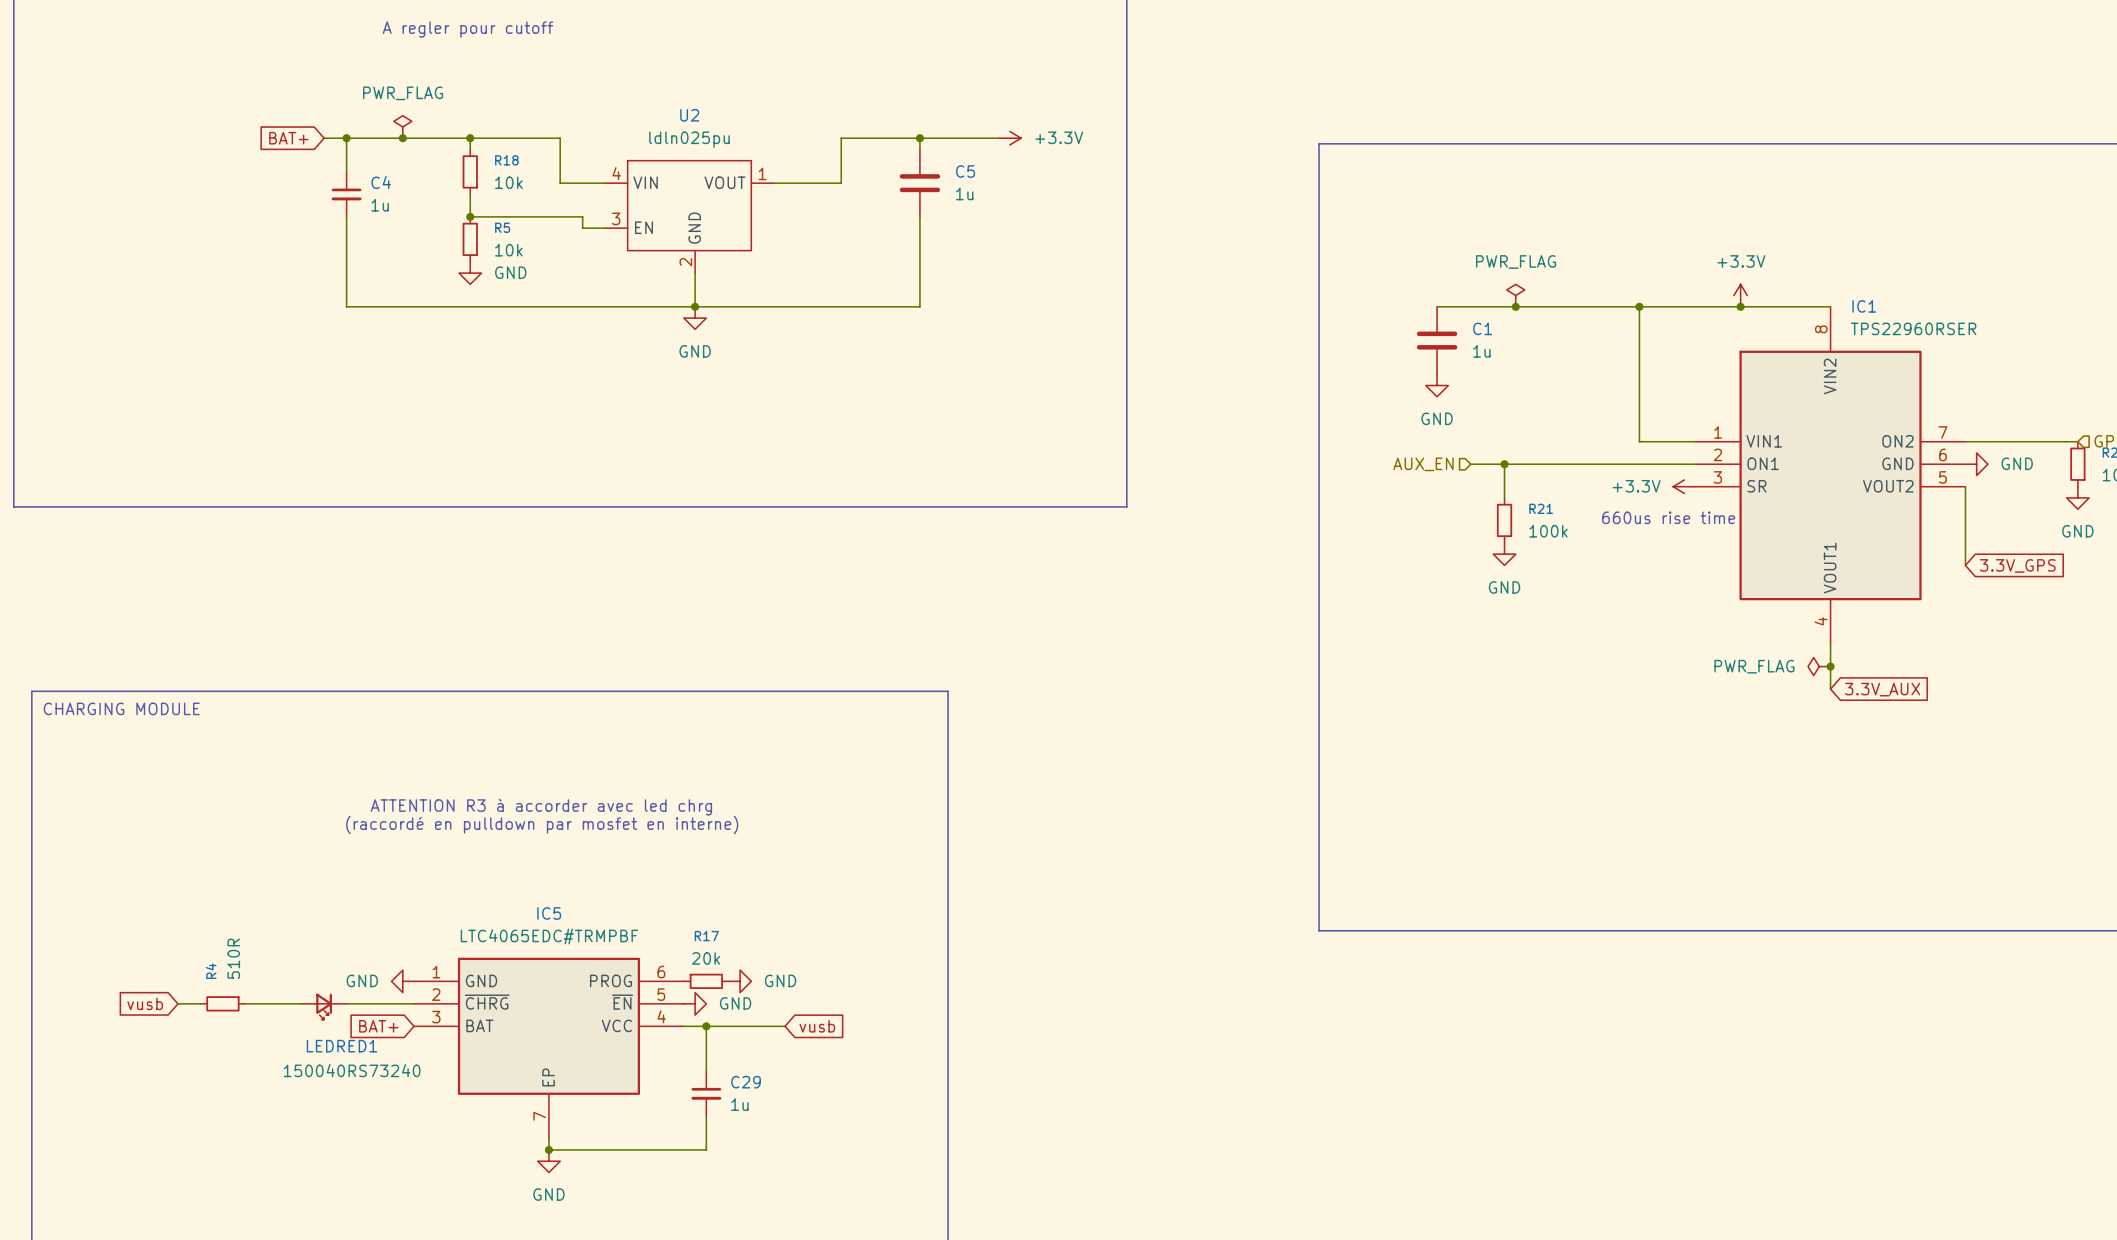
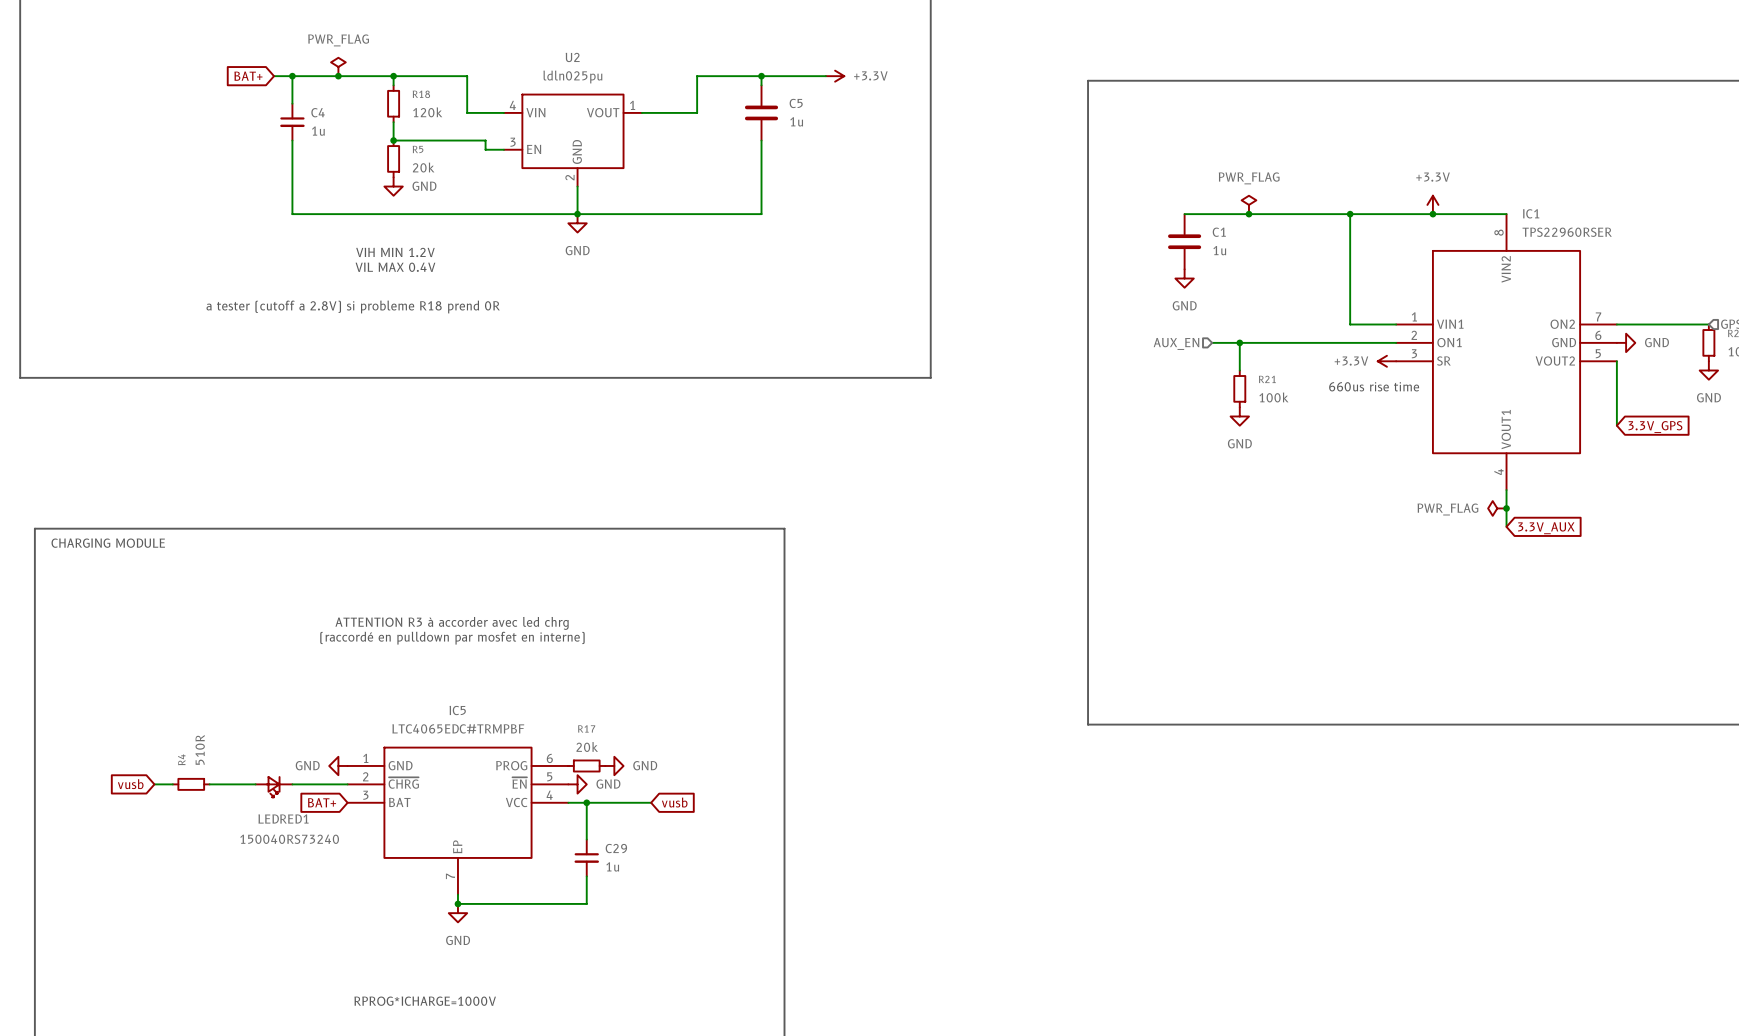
R18 value: 10k (508, 182) -> 120k (427, 112)
R5 value: 10k (508, 250) -> 20k (423, 167)
text: none -> VIH MIN 1.2V (395, 252)
text: none -> VIL MAX 0.4V (395, 267)
text: none -> a tester (cutoff a 2.8V) si probleme R18 prend 0R (353, 307)

